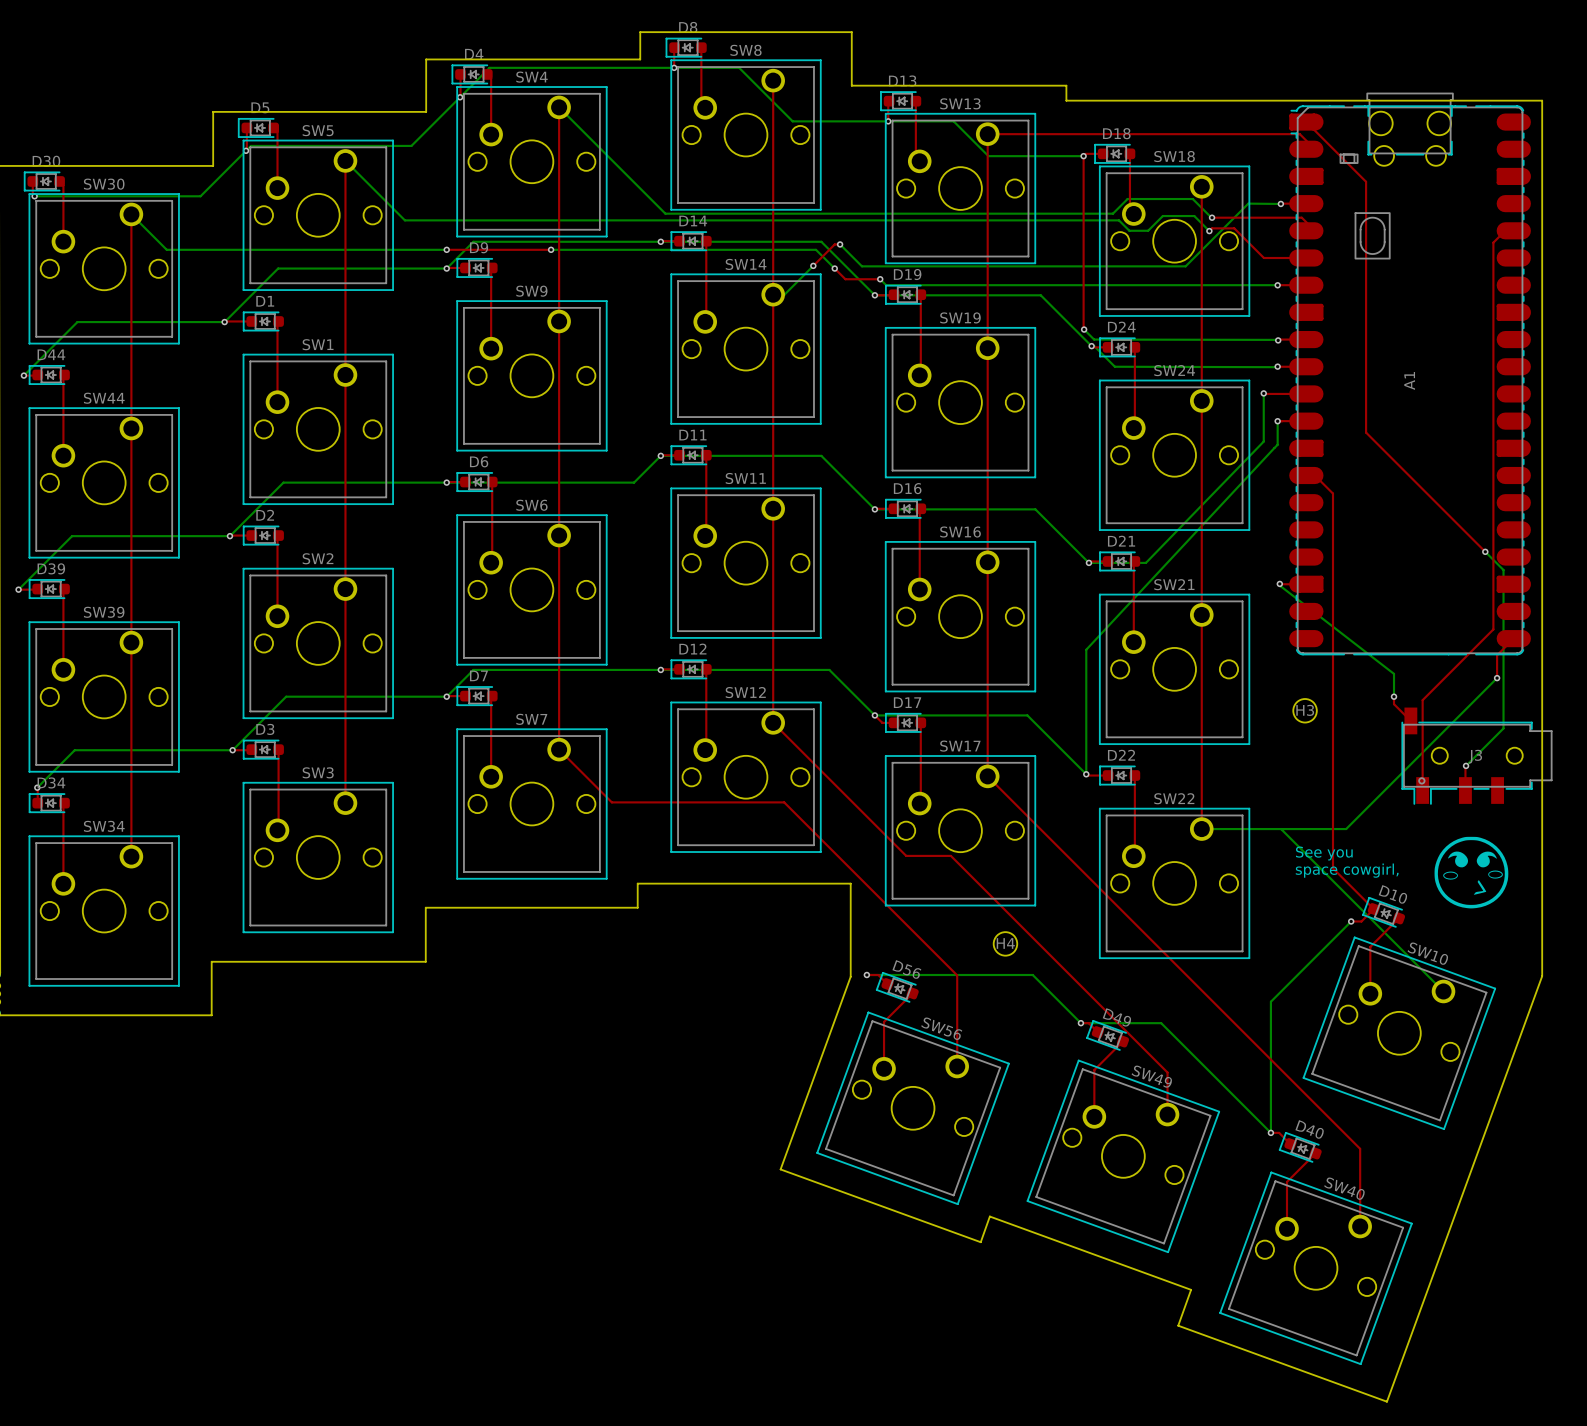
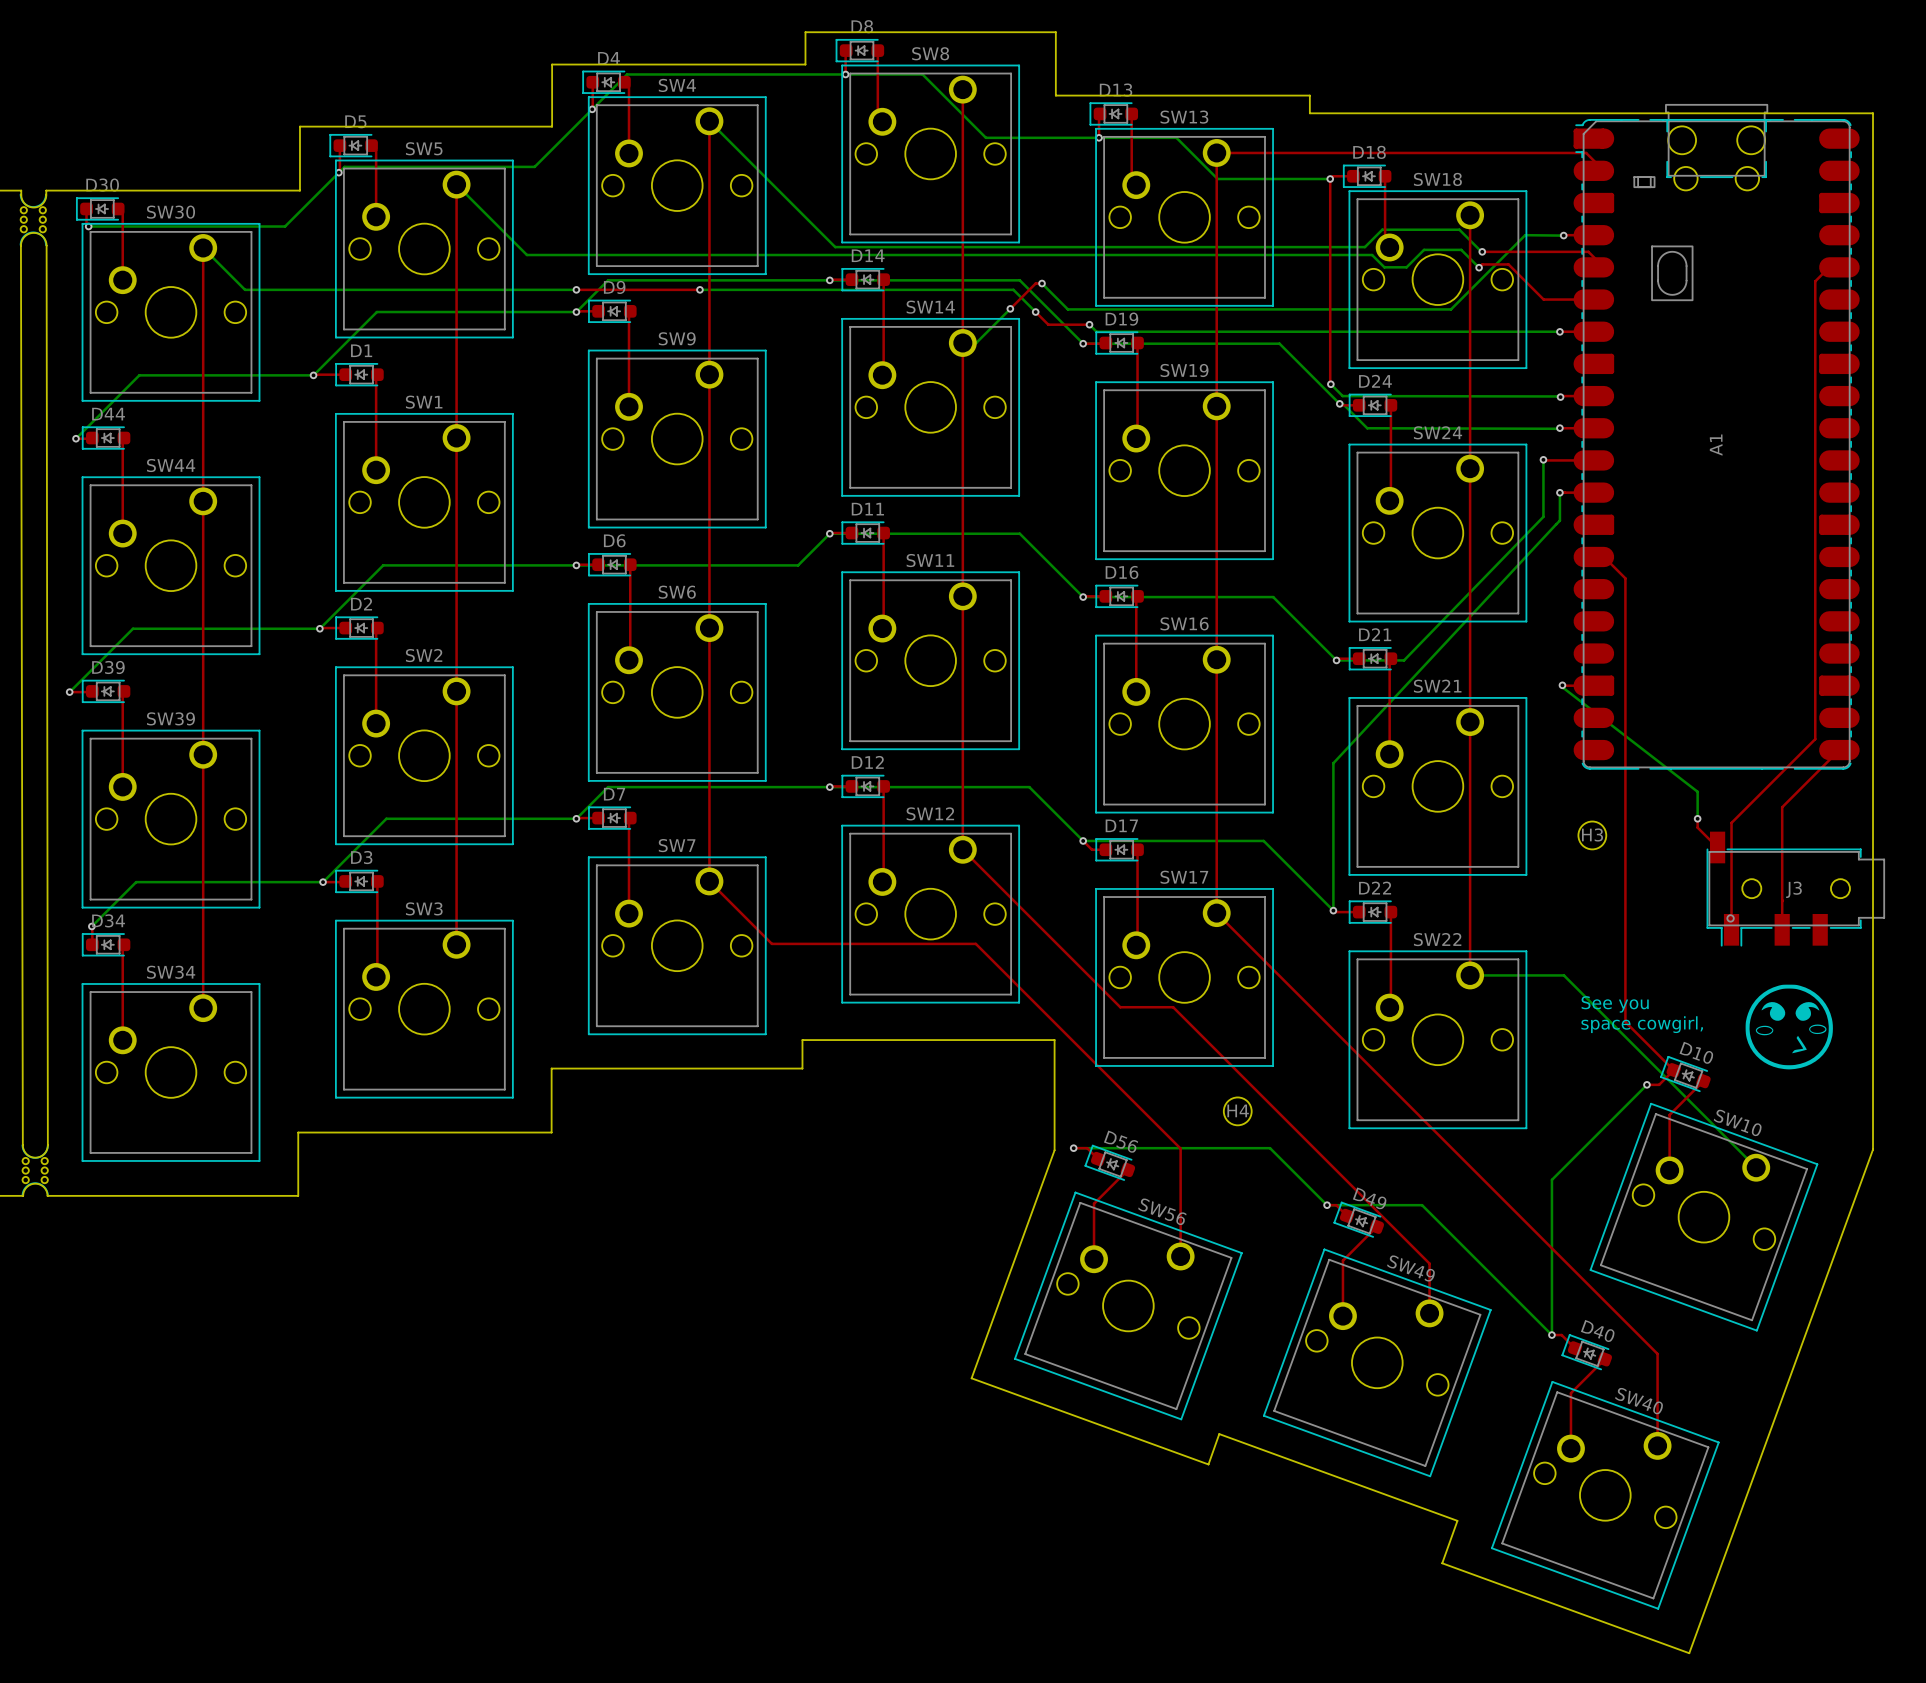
top track: (1306, 122) (1366, 181) (1366, 432) (1485, 551) -> none
bottom track: (1485, 551) (1503, 570) (1503, 728) (1466, 765) -> none
via: (1485, 551) -> none
top track: (1497, 655) (1497, 678) -> (1819, 769) (1782, 807) (1782, 901)
bottom track: (1497, 678) (1346, 829) (1281, 829) -> none
via: (1497, 678) -> none
via: (1466, 765) -> none

